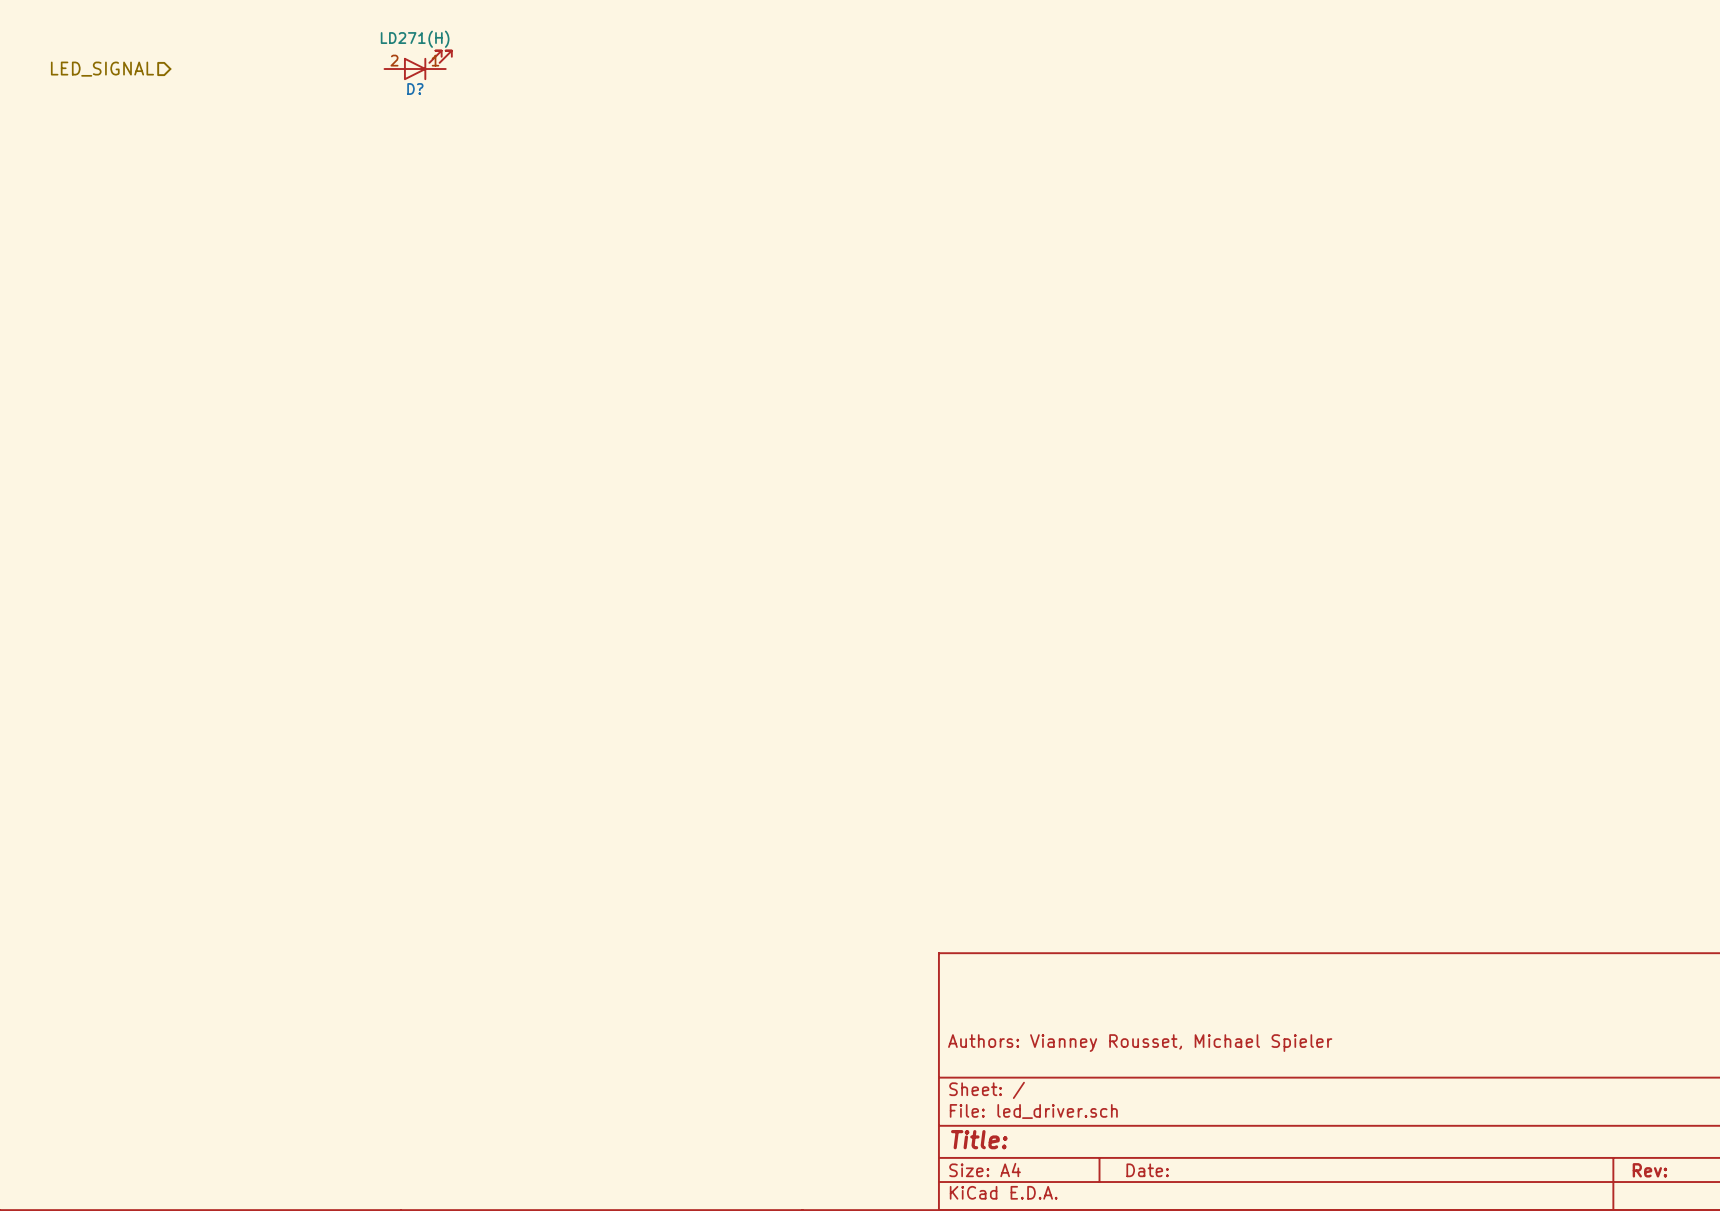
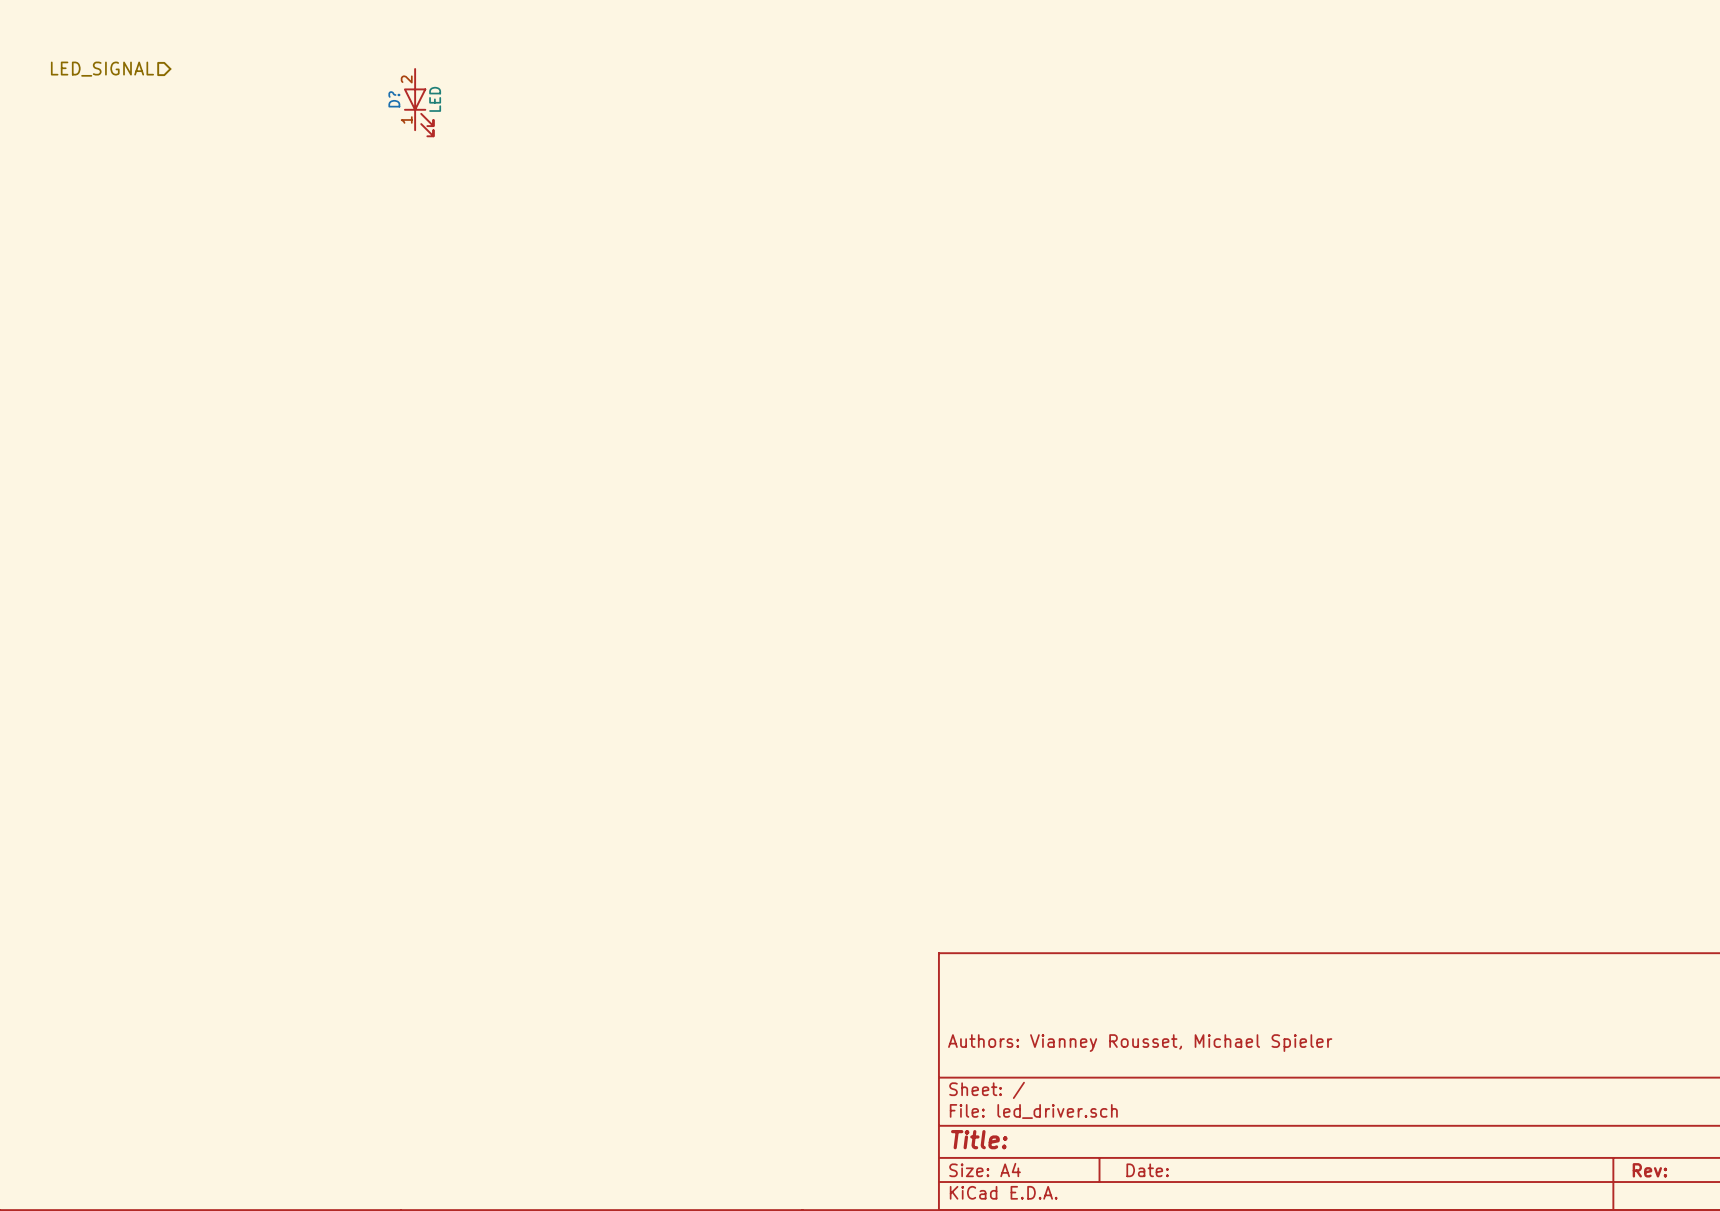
D?: LD271(H) (418, 65) -> none
D?: none -> LED (418, 102)

